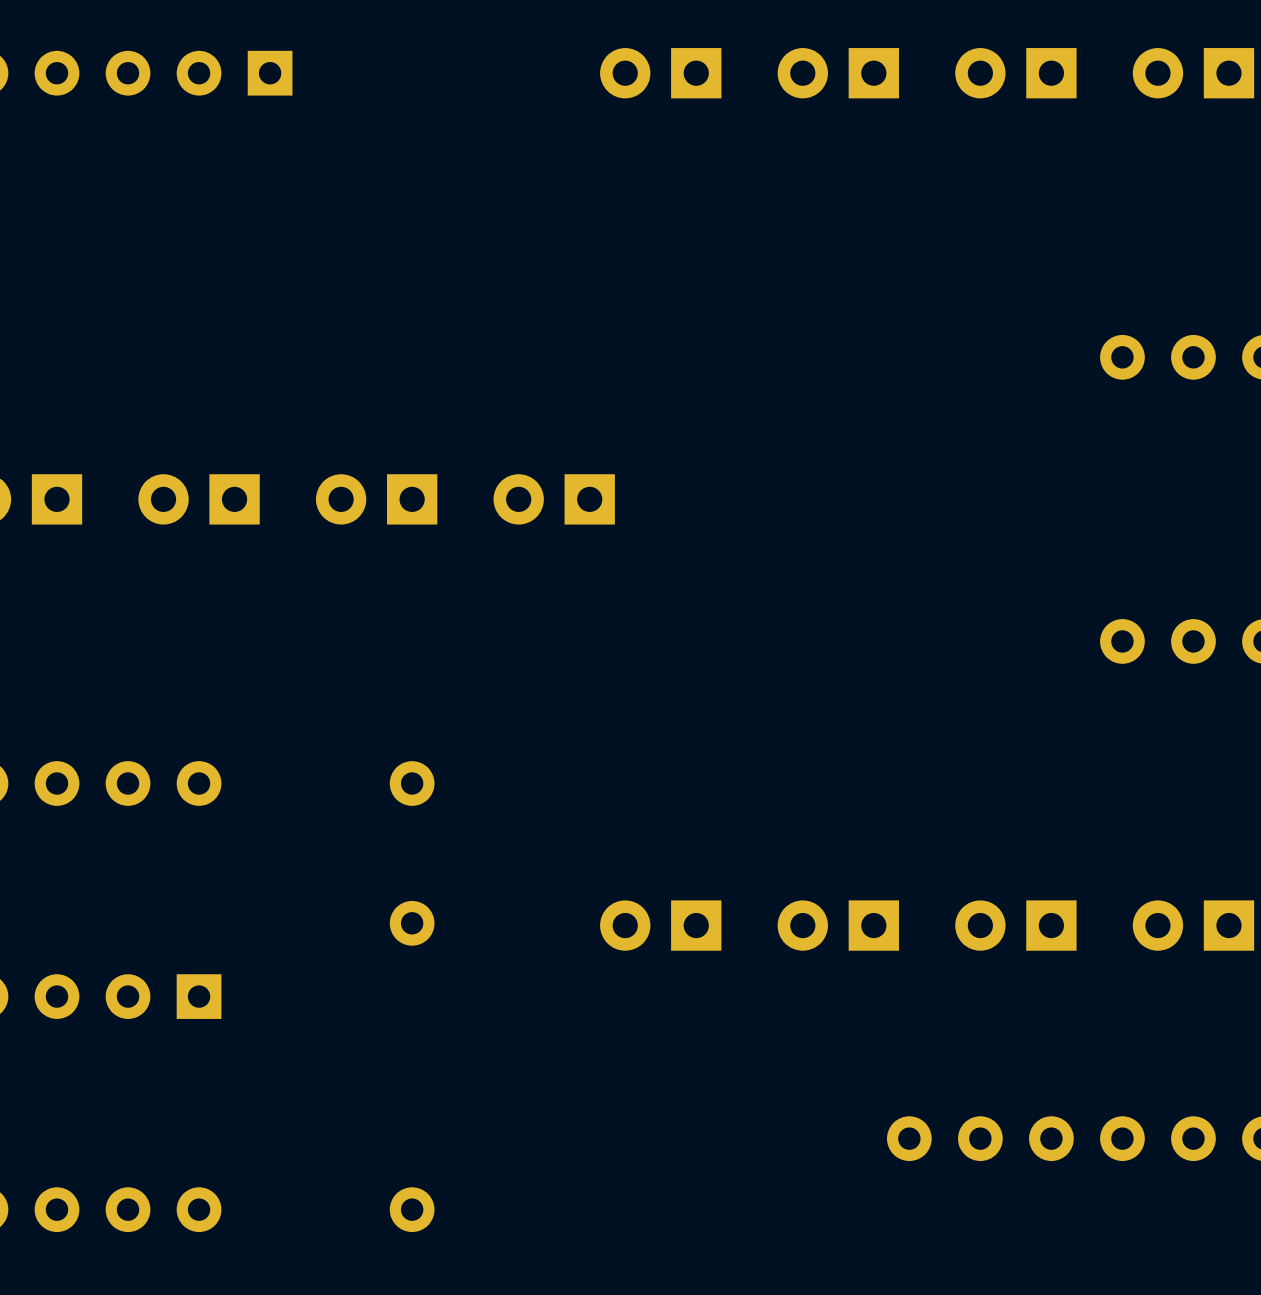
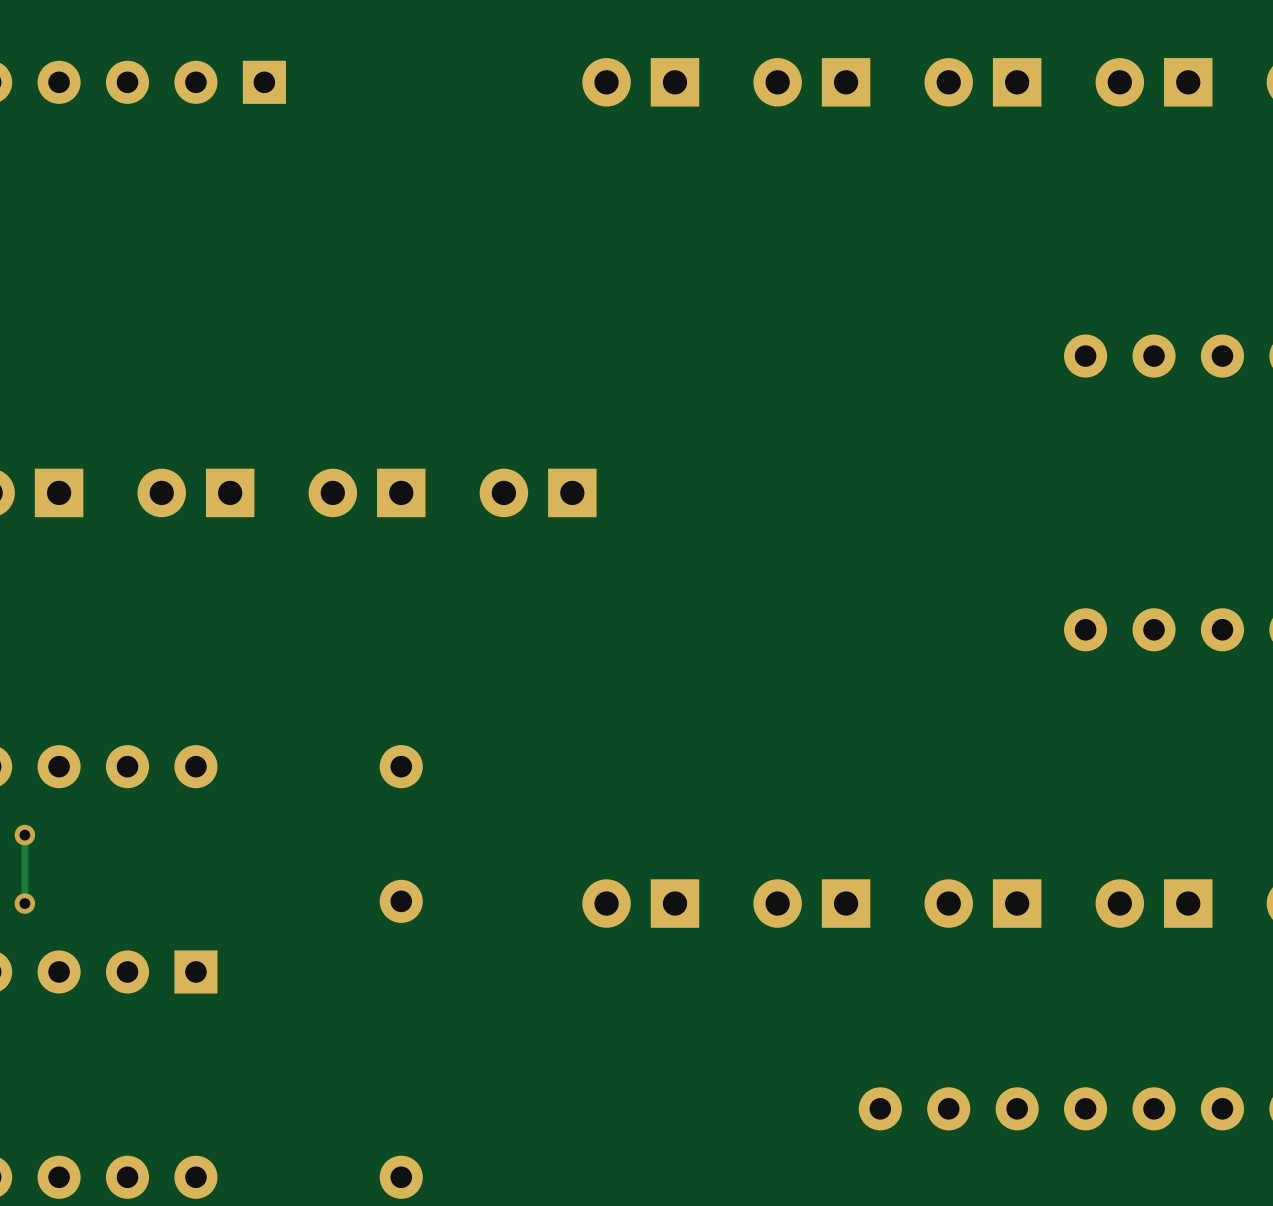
track: none -> (24, 835) (24, 903)
via: none -> (24, 835)
via: none -> (24, 903)

